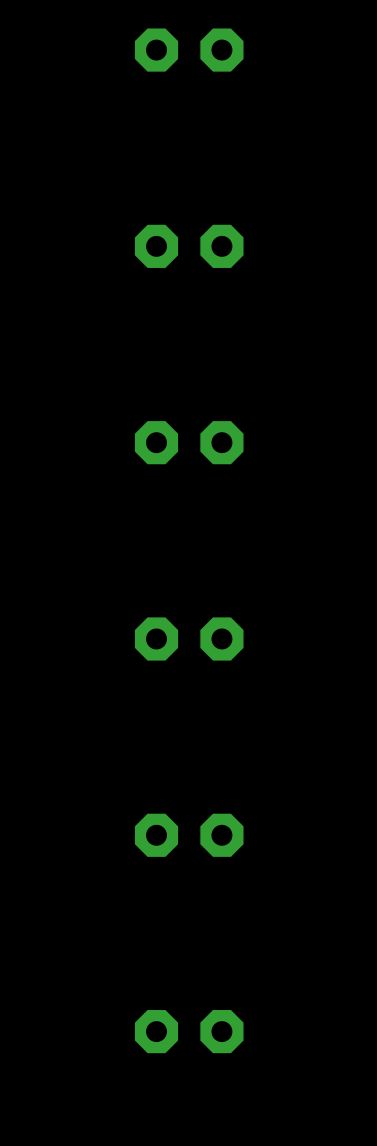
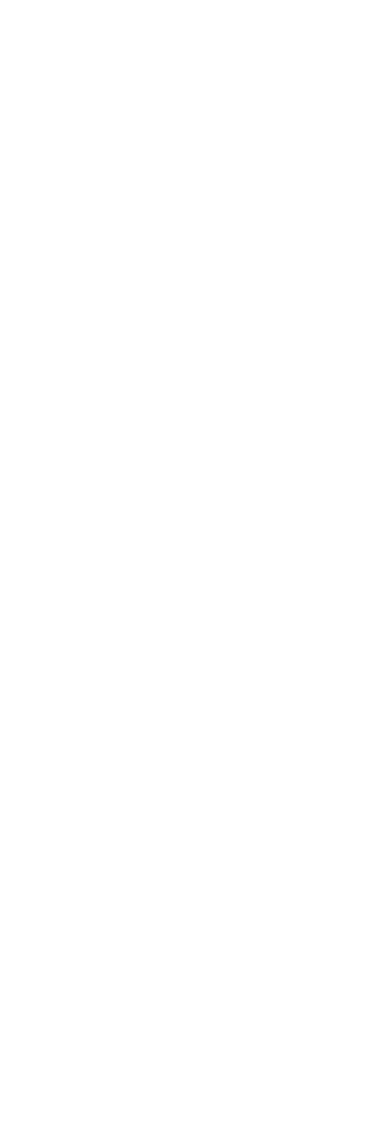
part: (189, 50) -> none
part: (189, 246) -> none
part: (189, 442) -> none
part: (189, 638) -> none
part: (189, 835) -> none
part: (189, 1031) -> none

